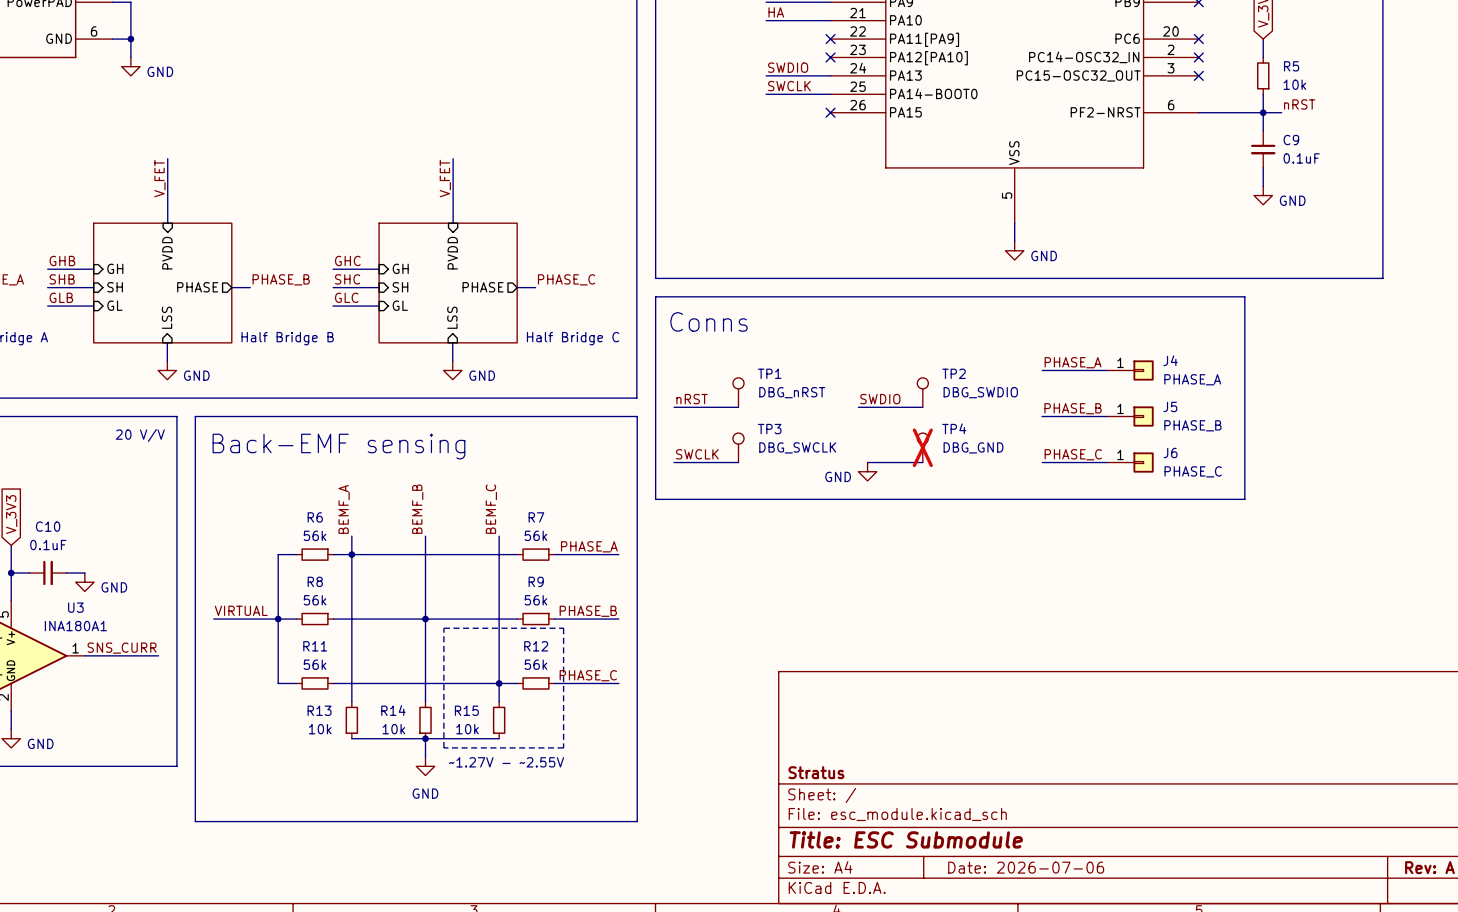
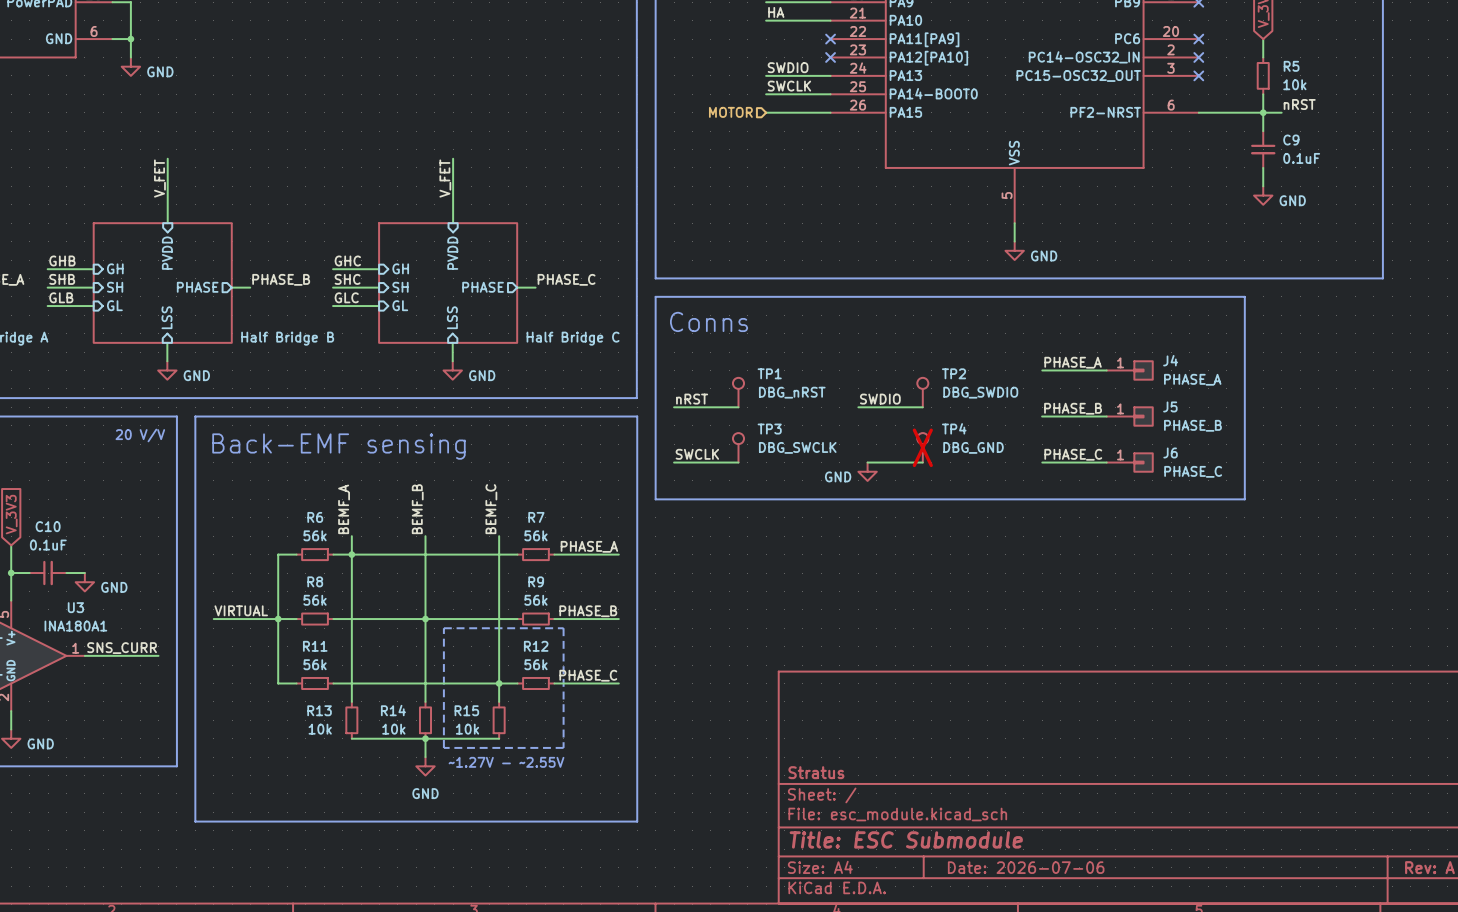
hierarchical label: none -> MOTOR (730, 112)
wire: none -> (766, 112) (830, 112)
no-connect mark: (830, 112) -> none

